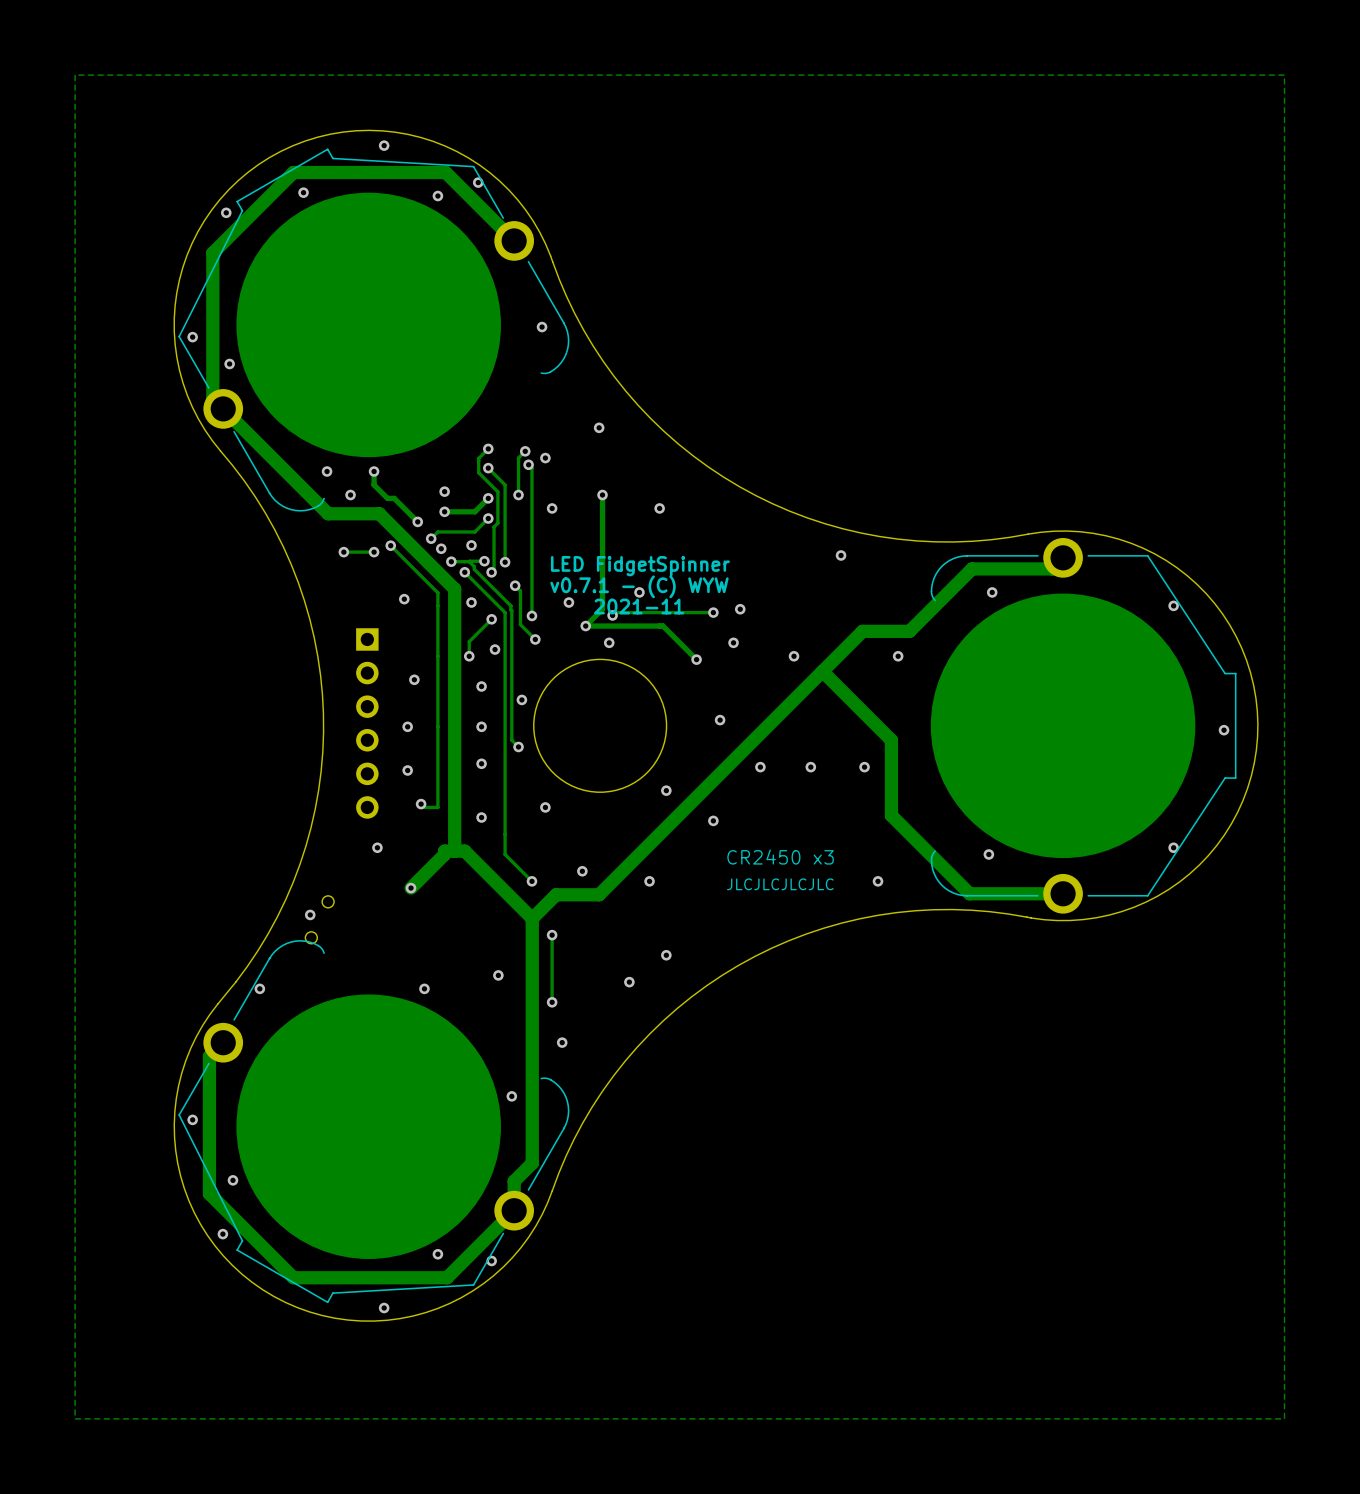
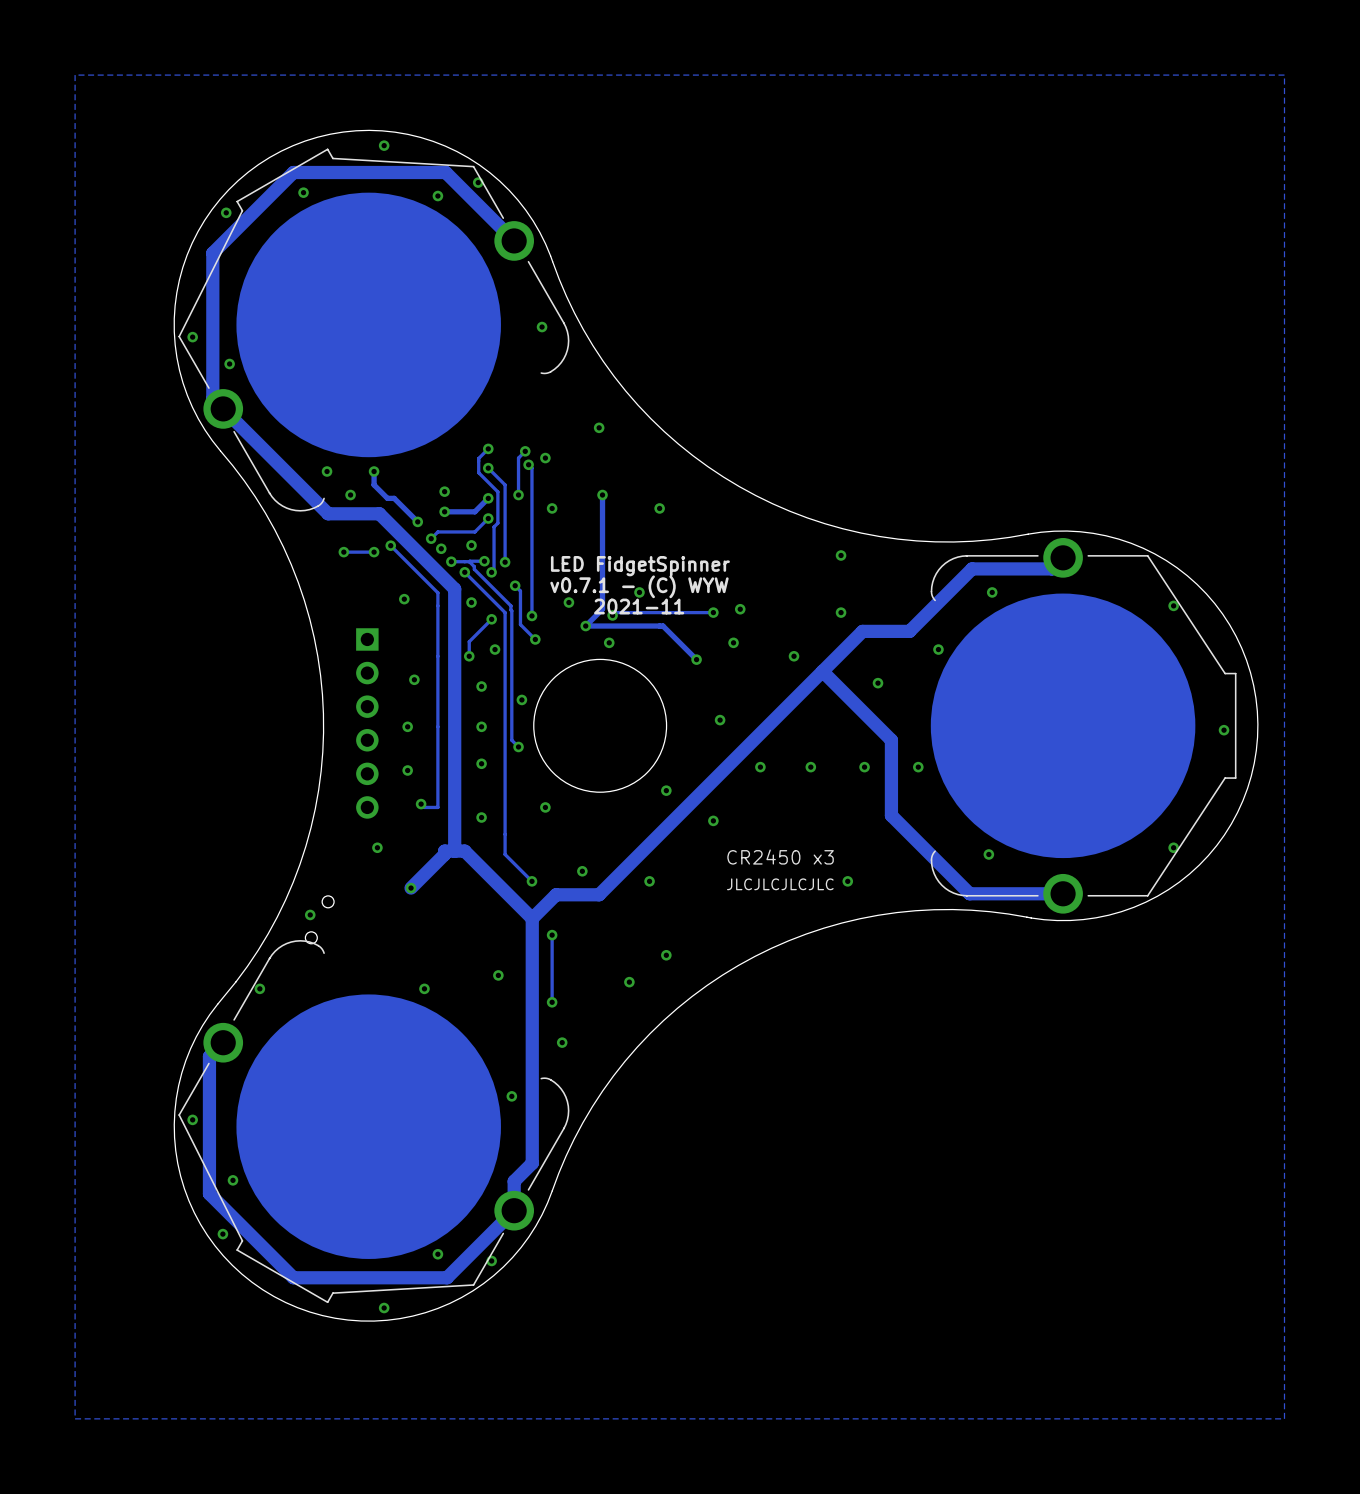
via: none -> (841, 612)
via: none -> (938, 649)
via: (898, 656) -> none
via: none -> (877, 683)
via: none -> (918, 767)
via position: (877, 881) -> (847, 881)

